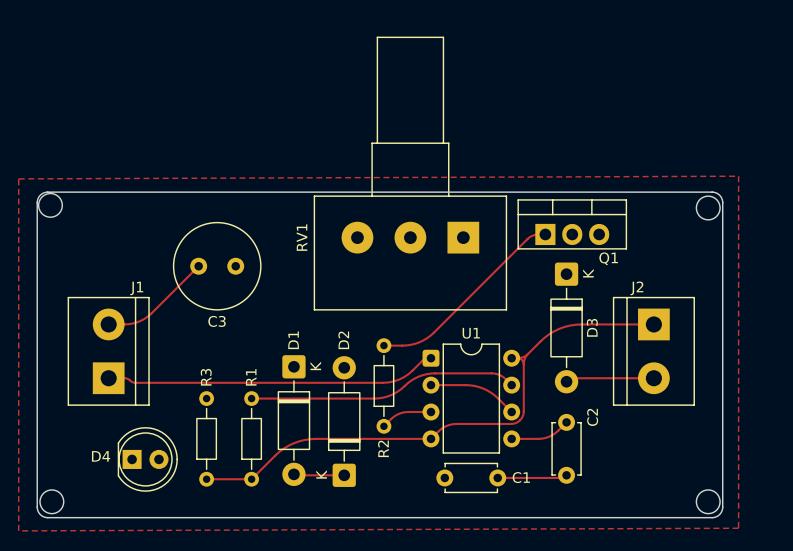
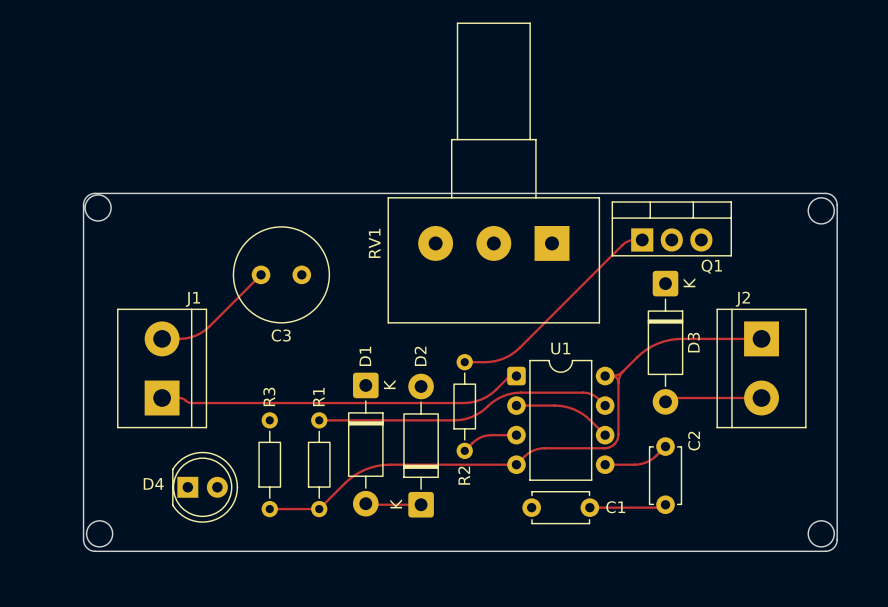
zone outline: (738, 176) (18, 178) (18, 530) (738, 528) (738, 176) -> none

